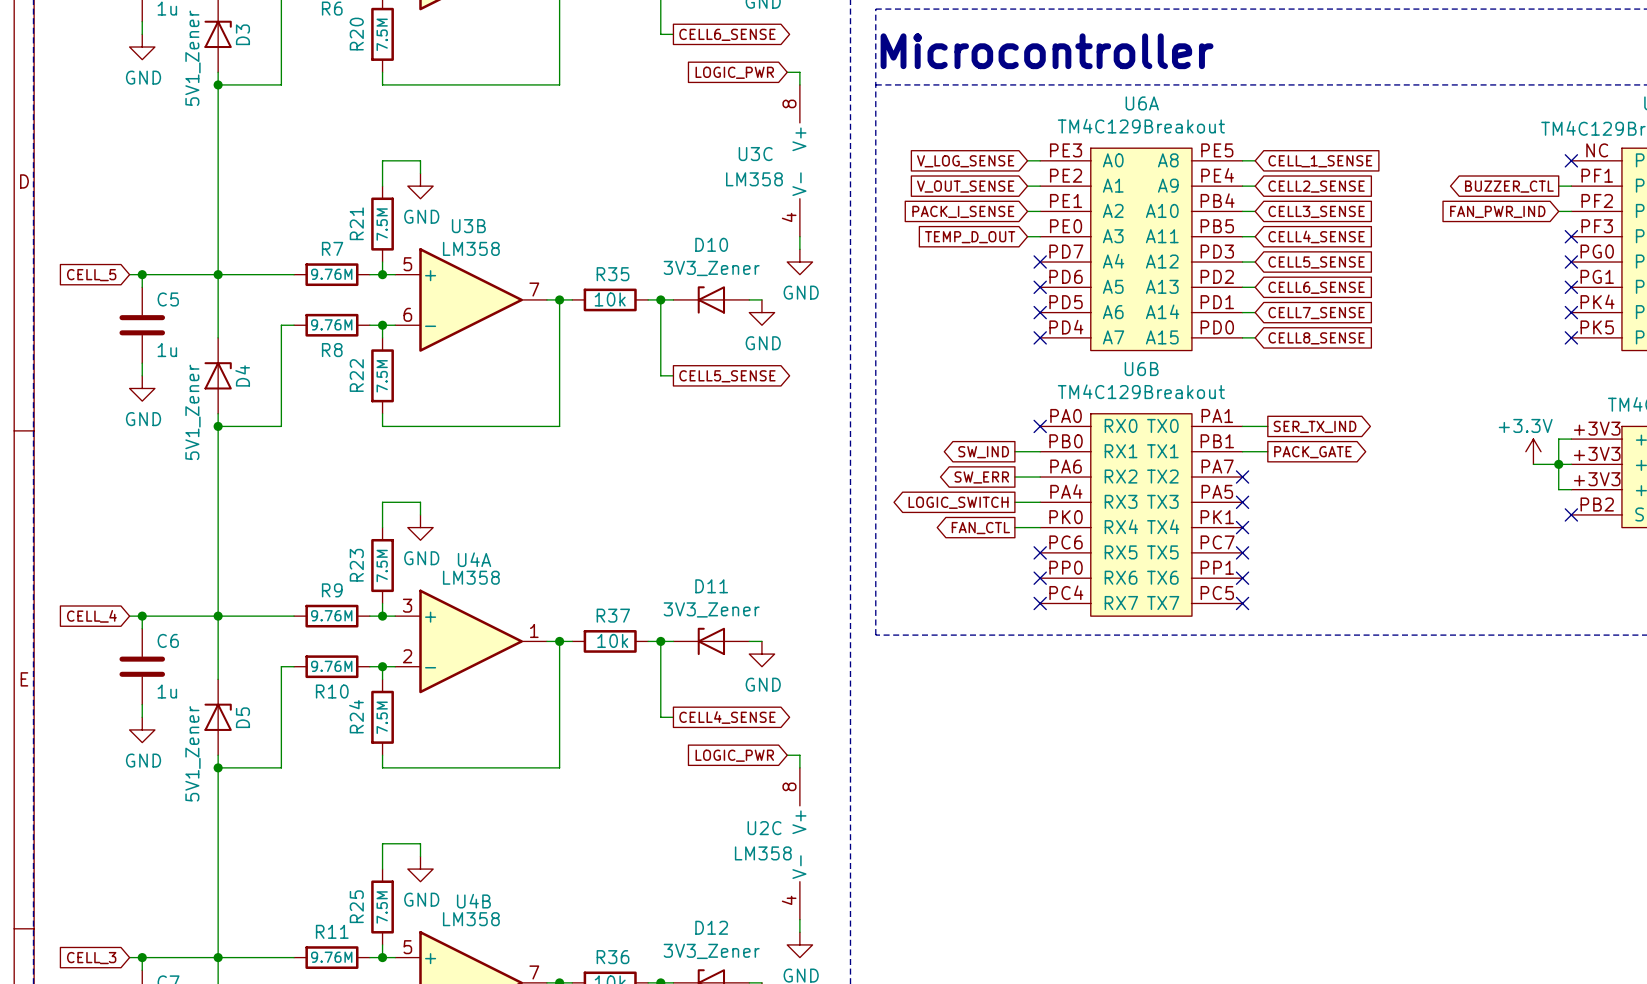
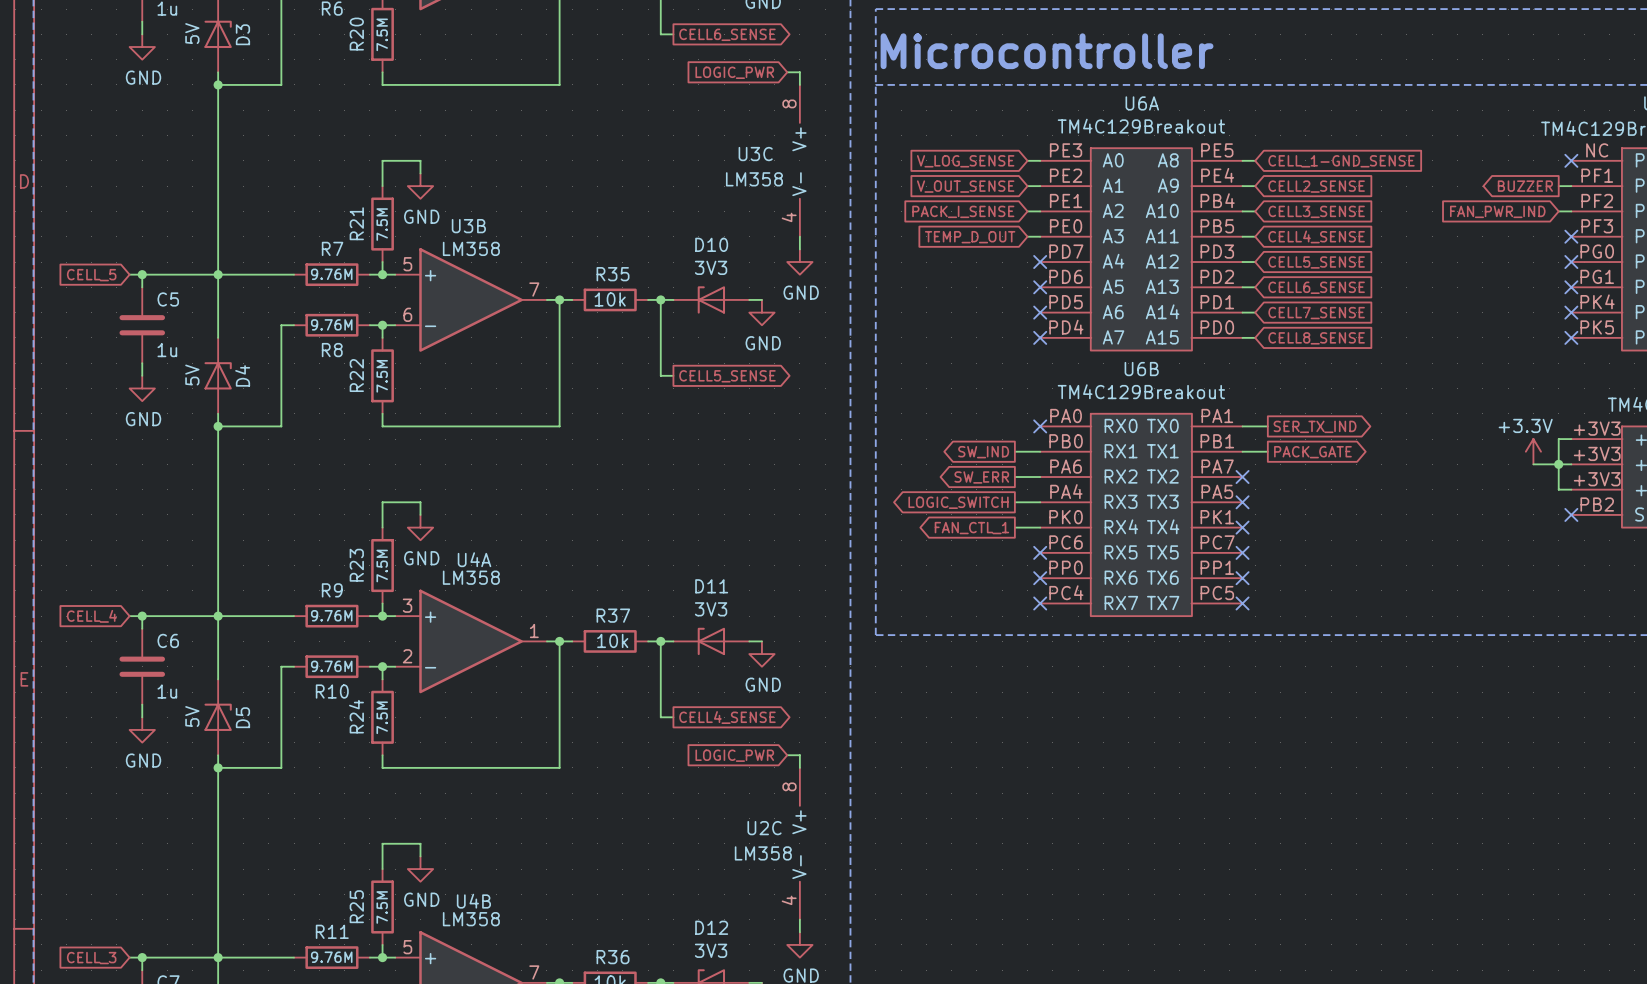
D3 value: 5V1_Zener (192, 58) -> 5V (192, 33)
global label: CELL_1_SENSE (1320, 161) -> CELL_1-GND_SENSE (1341, 161)
global label: BUZZER_CTL (1509, 186) -> BUZZER (1525, 186)
D10 value: 3V3_Zener (711, 268) -> 3V3 (711, 267)
D4 value: 5V1_Zener (192, 412) -> 5V (192, 375)
global label: FAN_CTL (980, 528) -> FAN_CTL_1 (971, 528)
D11 value: 3V3_Zener (711, 609) -> 3V3 (711, 609)
D5 value: 5V1_Zener (192, 753) -> 5V (192, 716)
D12 value: 3V3_Zener (711, 951) -> 3V3 (711, 950)

